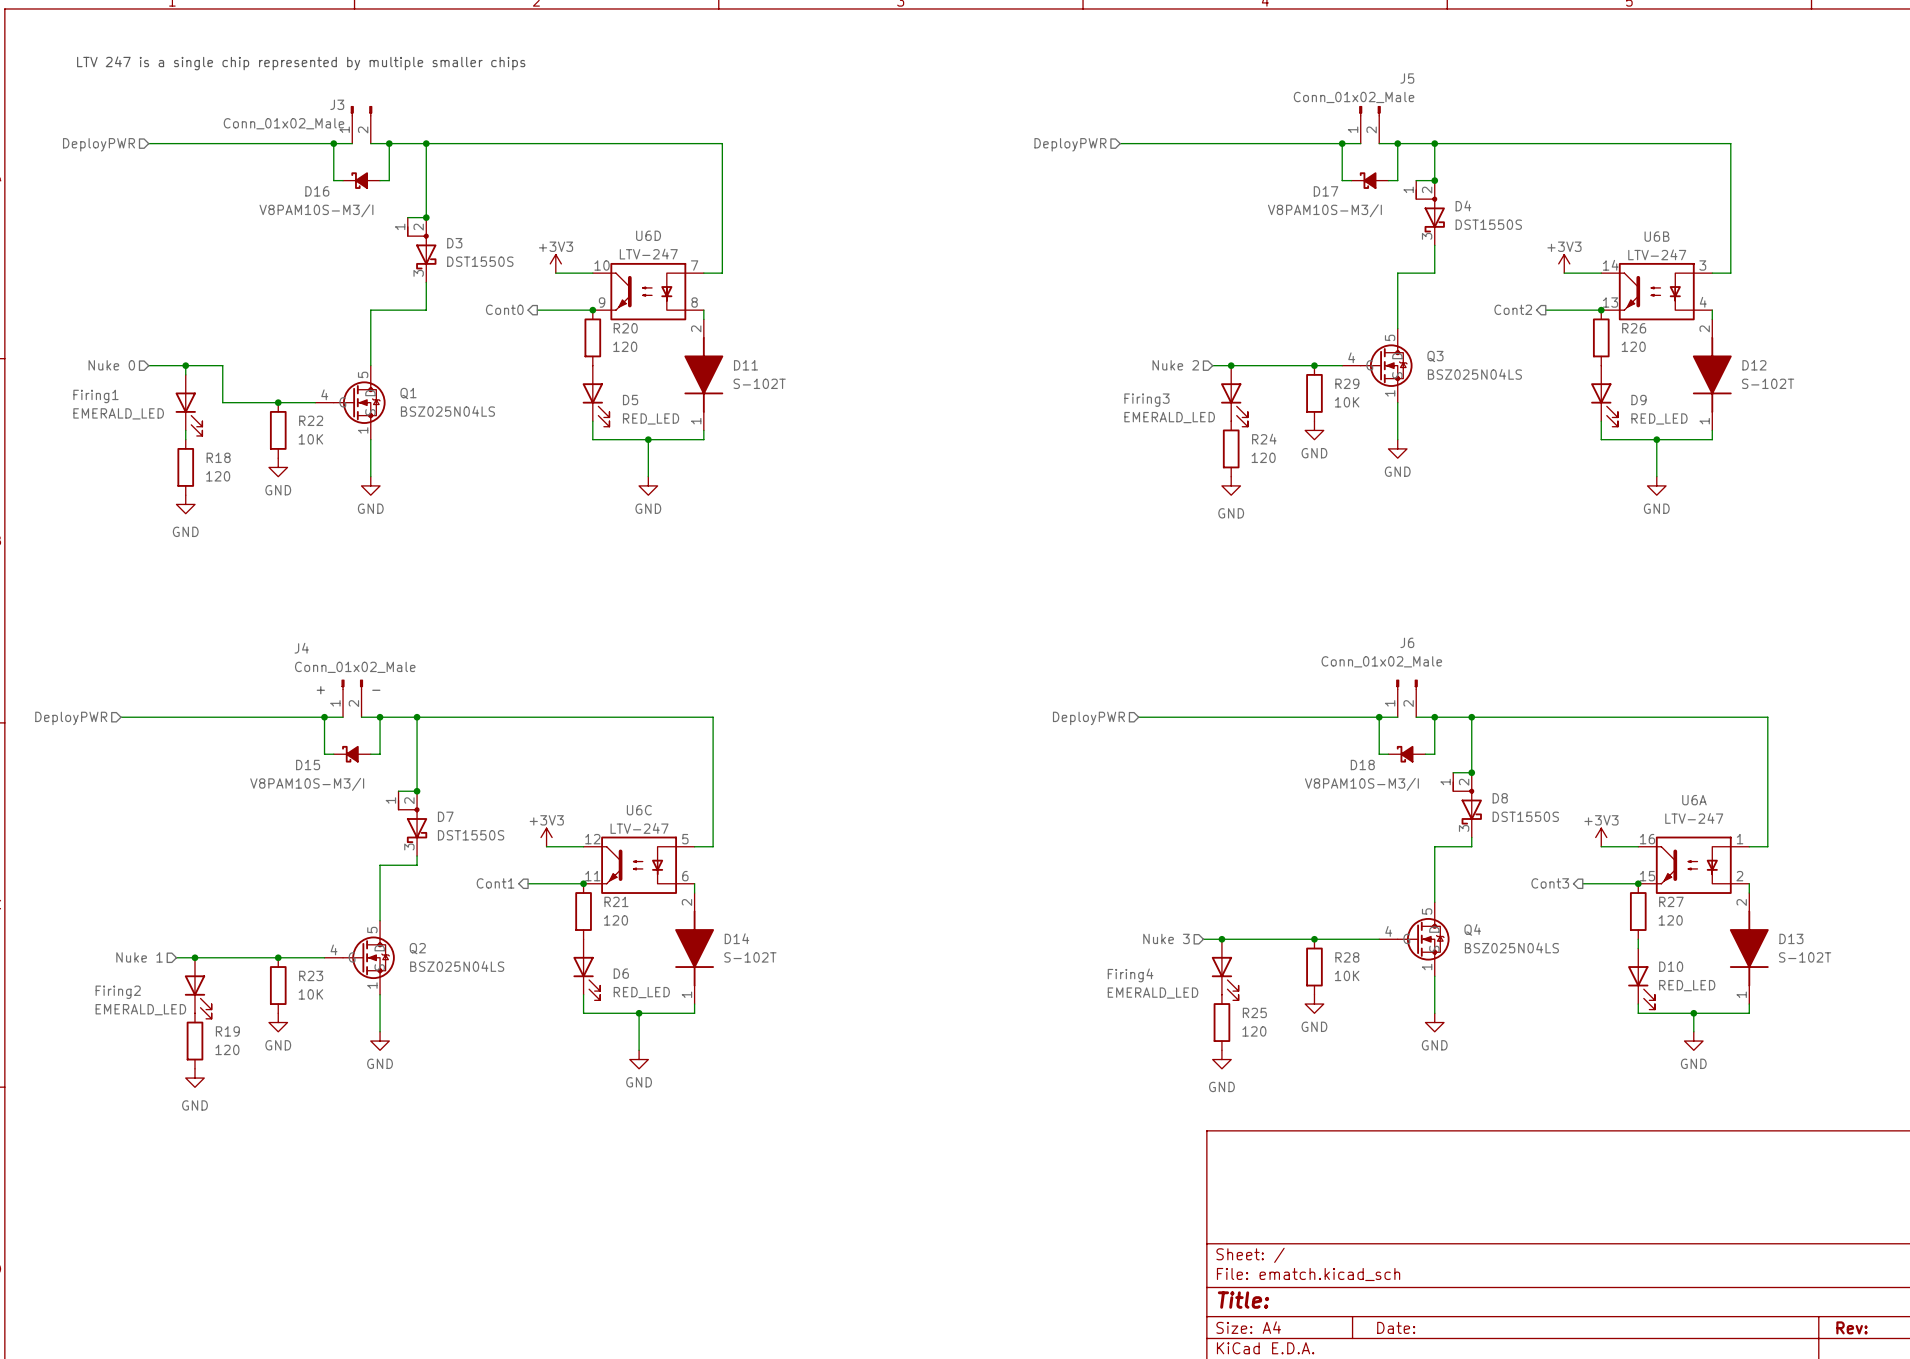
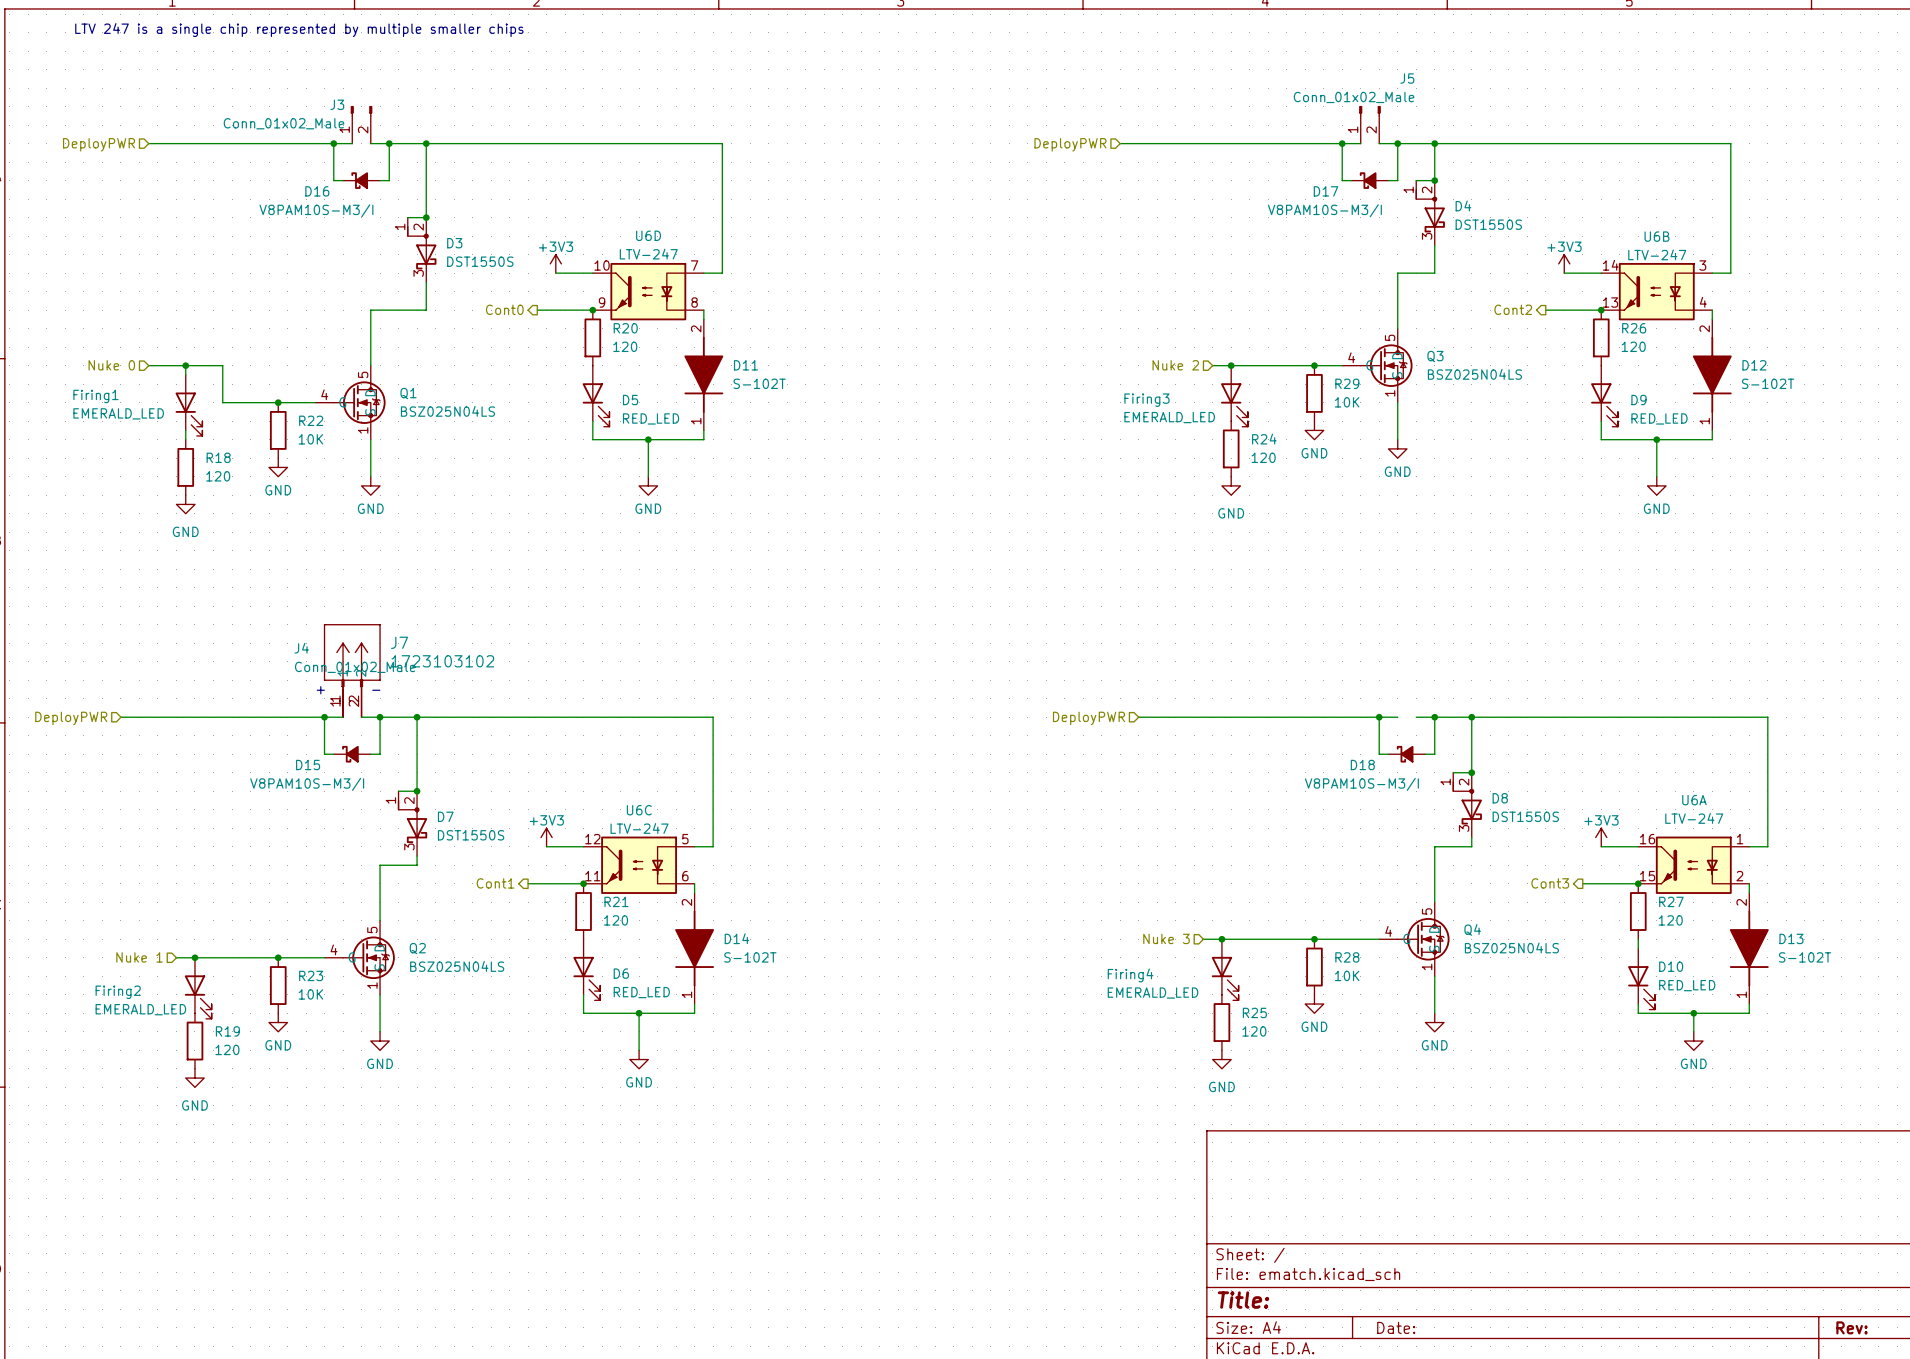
text position: LTV 247 is a single chip represented by multiple smaller chips (301, 63) -> LTV 247 is a single chip represented by multiple smaller chips (299, 30)
J7: none -> 1723103102 (352, 670)
J6: Conn_01x02_Male (1406, 698) -> none

